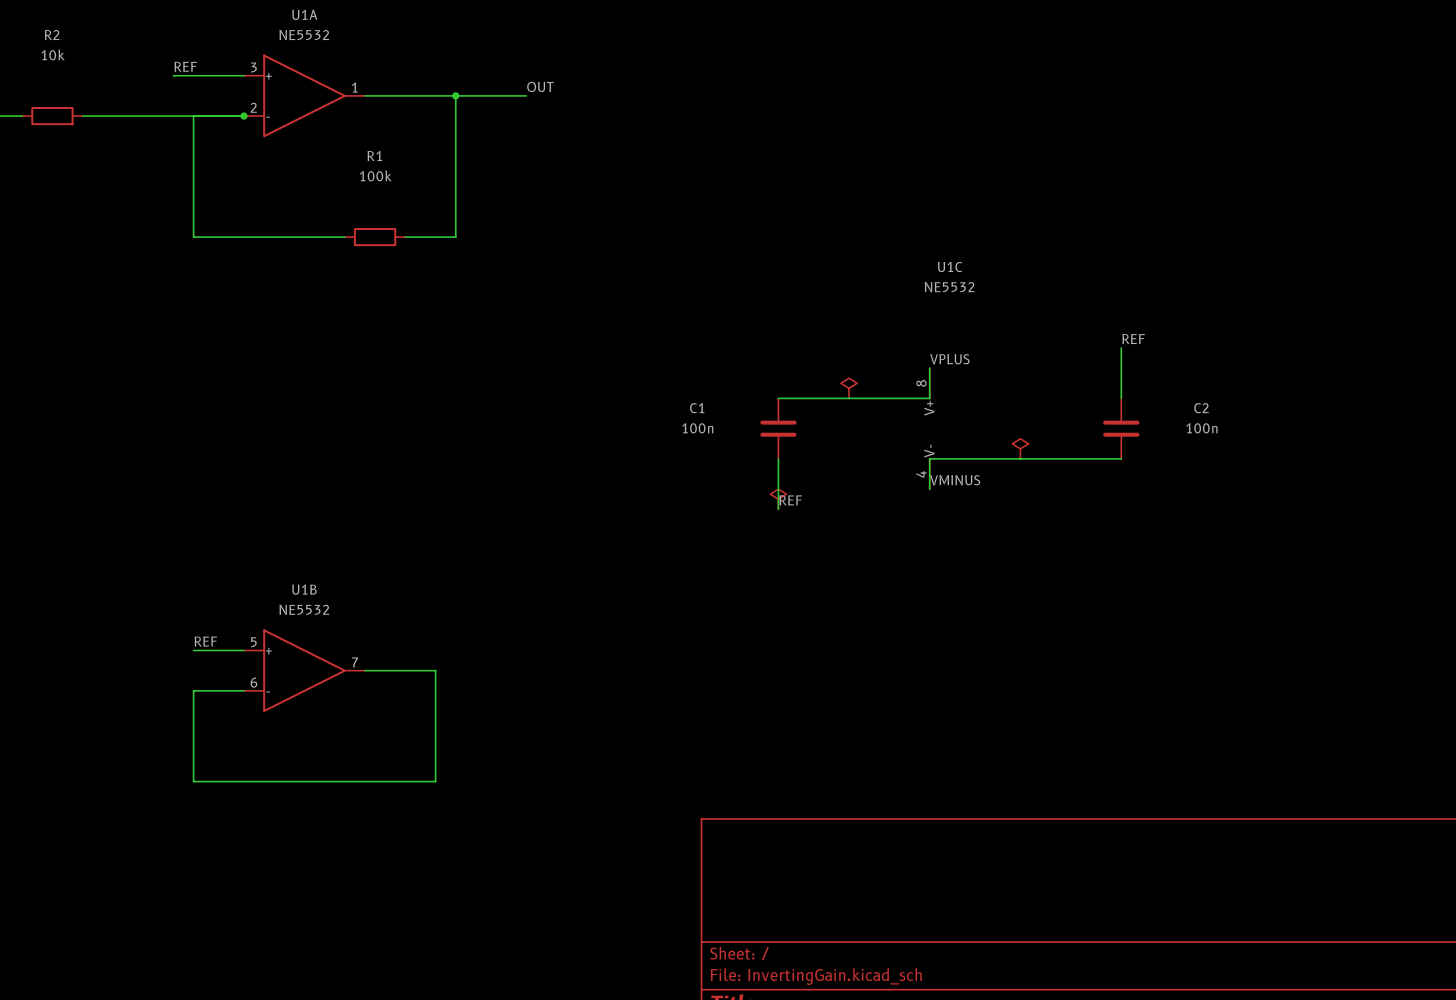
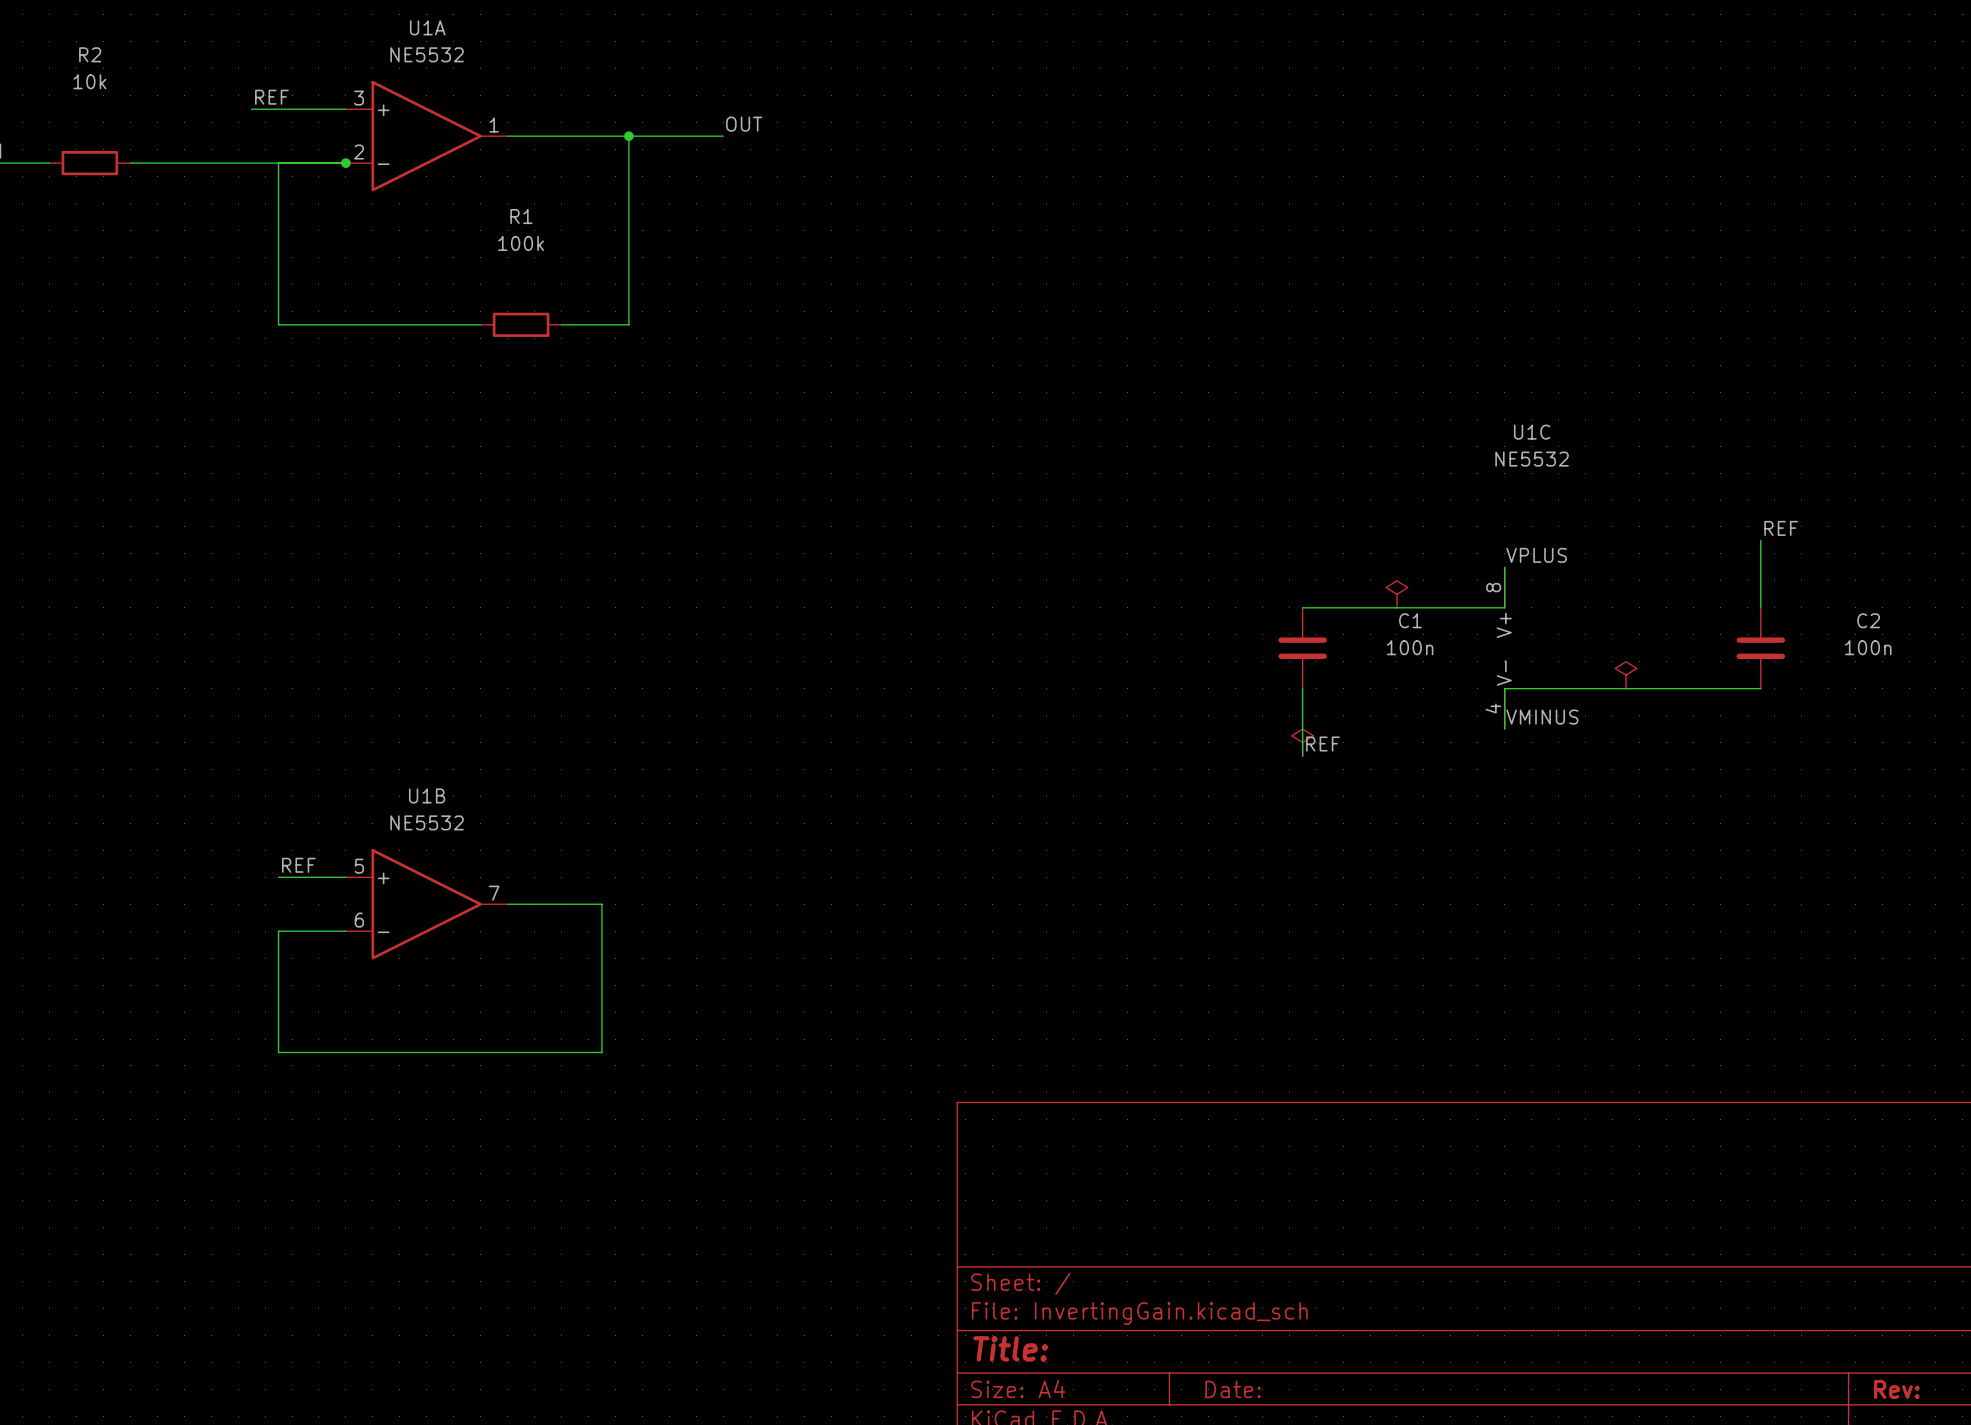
label: REF (1133, 339) -> none
wire: (1121, 347) (1121, 398) -> (1760, 540) (1760, 607)
label position: VPLUS (949, 359) -> VPLUS (1536, 555)
wire: (929, 368) (929, 398) (778, 398) -> (1504, 567) (1504, 607) (1302, 607)
power symbol: (849, 388) -> none
label: none -> REF (1781, 528)
C1 name position: C1 (697, 408) -> C1 (1410, 620)
C1 value position: 100n (697, 428) -> 100n (1410, 647)
C1 position: (778, 428) -> (1302, 648)
U1C position: (929, 428) -> (1504, 648)
C2 position: (1121, 428) -> (1760, 648)
power symbol position: (1020, 448) -> (1396, 594)
wire: (778, 458) (778, 509) -> (1302, 688) (1302, 756)
wire: (1121, 458) (929, 458) (929, 489) -> (1760, 688) (1504, 688) (1504, 729)
label position: VMINUS (955, 480) -> VMINUS (1542, 717)
power symbol: (778, 499) -> none
power symbol: none -> (1626, 675)
label: REF (790, 500) -> none
power symbol: none -> (1302, 742)
label: none -> REF (1322, 744)

